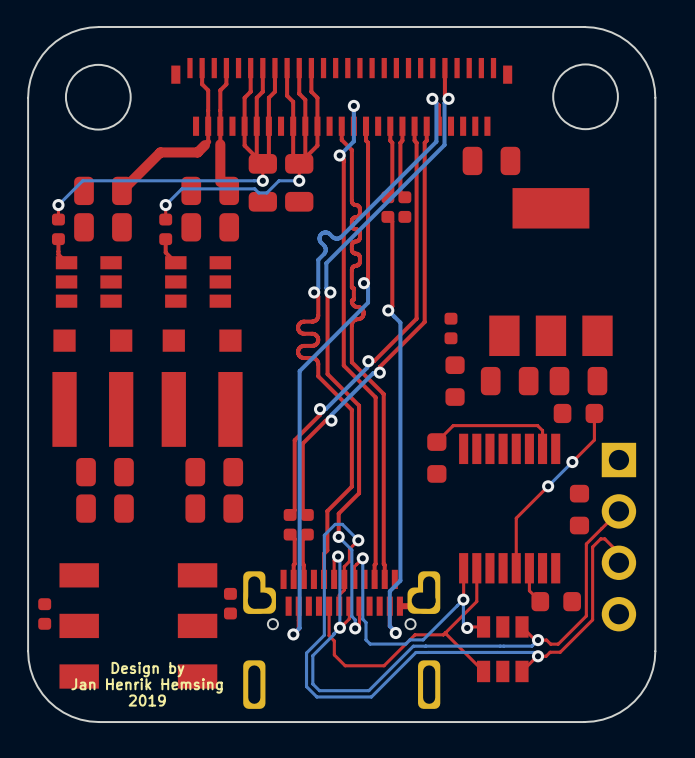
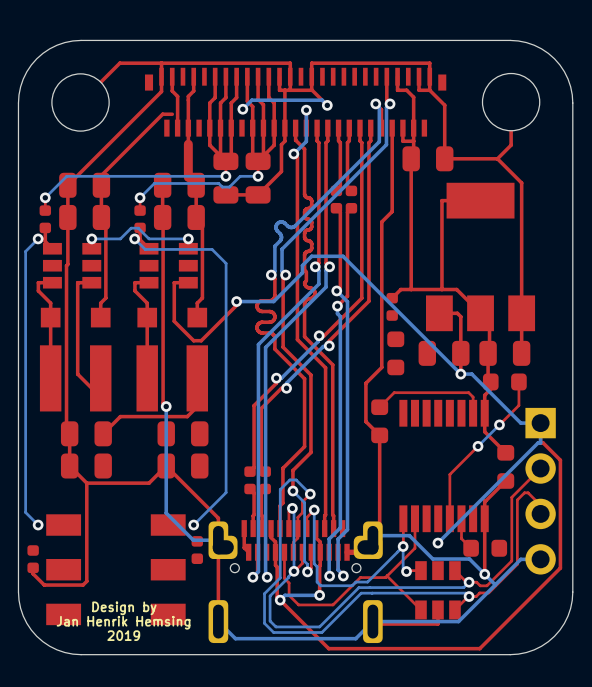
top track: none -> (161, 63) (161, 91) (67, 185) (66, 430) (69, 433) (69, 466) (86, 483)
top track: none -> (279, 76) (279, 90) (312, 90) (327, 105)
top track: none -> (397, 76) (397, 90) (406, 90) (413, 97) (413, 156) (411, 158) (411, 289)
top track: none -> (419, 76) (419, 90) (429, 90)
top track: none -> (284, 90) (284, 141) (281, 144) (281, 171) (258, 194) (225, 194)
top track: none -> (290, 90) (290, 63) (119, 63) (80, 102)
top track: none -> (429, 90) (444, 105) (444, 158) (497, 158)
top track: none -> (429, 90) (429, 63) (311, 63) (311, 90)
top track: none -> (511, 102) (511, 145) (497, 158)
bottom track: none -> (327, 105) (322, 100) (251, 100) (242, 109)
via: none -> (327, 105)
via: none -> (242, 109)
top track: none -> (172, 114) (162, 114) (101, 175) (101, 217) (105, 221) (105, 298) (100, 303) (100, 317)
top track: (208, 126) (208, 141) (197, 152) (160, 152) (121, 190) -> none
top track: none -> (327, 128) (327, 140) (326, 142) (326, 263) (329, 266)
top track: none -> (392, 128) (392, 211) (381, 221) (381, 367) (365, 383) (365, 421) (379, 435) (379, 533) (372, 540)
top track: none -> (402, 128) (402, 141) (413, 141)
top track: none -> (497, 158) (521, 182) (521, 353)
top track: none -> (162, 185) (163, 403) (166, 406)
top track: none -> (196, 185) (196, 217) (202, 223) (202, 298) (197, 303) (197, 317)
top track: none -> (480, 200) (441, 200) (441, 289)
top track: none -> (351, 208) (347, 212) (347, 296) (337, 306)
bottom track: none -> (38, 238) (25, 251) (25, 512) (38, 525)
via: none -> (38, 238)
via: none -> (91, 238)
bottom track: none -> (134, 238) (145, 249) (212, 249) (226, 263) (226, 492) (193, 525)
via: none -> (134, 238)
bottom track: none -> (188, 238) (149, 238) (138, 228) (131, 228) (120, 238) (91, 238)
via: none -> (188, 238)
bottom track: none -> (329, 266) (326, 270) (326, 287) (265, 347) (265, 573) (269, 577)
via: none -> (329, 266)
top track: none -> (52, 282) (38, 282) (38, 290) (50, 303) (50, 378)
top track: none -> (91, 282) (77, 282) (77, 374) (100, 397)
top track: none -> (149, 282) (134, 282) (134, 290) (147, 303) (147, 378)
top track: none -> (188, 282) (174, 282) (174, 321) (193, 340) (201, 340) (236, 305) (236, 301)
top track: none -> (392, 298) (400, 289) (456, 289) (480, 313) (489, 313) (488, 379) (490, 381) (490, 389) (484, 395) (484, 431) (505, 452)
bottom track: none -> (236, 301) (273, 301) (302, 272) (302, 265) (311, 256) (343, 256) (460, 374) (471, 374) (520, 423) (540, 423) (540, 442) (538, 442) (437, 543)
via: none -> (236, 301)
bottom track: none -> (337, 306) (337, 313) (340, 316) (340, 527) (329, 539) (329, 573) (326, 576)
via: none -> (337, 306)
top track: none -> (439, 313) (457, 313) (460, 316) (460, 374)
via: none -> (460, 374)
bottom track: none -> (166, 406) (166, 513) (193, 540) (218, 540)
via: none -> (166, 406)
top track: none -> (197, 406) (187, 416) (120, 416) (103, 433)
top track: none -> (540, 423) (540, 442) (543, 442) (560, 460) (560, 568) (479, 648) (328, 648) (277, 597) (275, 542) (271, 537) (271, 528)
top track: none -> (505, 480) (484, 500) (484, 574)
top track: none -> (86, 483) (149, 483) (166, 466) (218, 518) (218, 540) (223, 545) (218, 552) (218, 621)
top track: none -> (86, 483) (86, 581) (83, 585) (44, 585) (33, 573) (33, 567)
via: none -> (38, 525)
via: none -> (193, 525)
top track: none -> (244, 528) (244, 547) (248, 552)
top track: none -> (315, 528) (315, 537) (320, 542) (319, 595)
bottom track: none -> (372, 540) (377, 535) (409, 535) (432, 559) (469, 559) (495, 584)
via: none -> (437, 543)
bottom track: none -> (540, 559) (520, 559) (458, 621) (372, 621) (355, 638) (235, 638) (218, 621)
via: none -> (484, 574)
via: none -> (329, 576)
via: none -> (267, 577)
bottom track: none -> (319, 595) (285, 595) (280, 600)
via: none -> (319, 595)
via: none -> (280, 600)
top track: none -> (437, 609) (437, 624) (375, 624) (372, 621)

